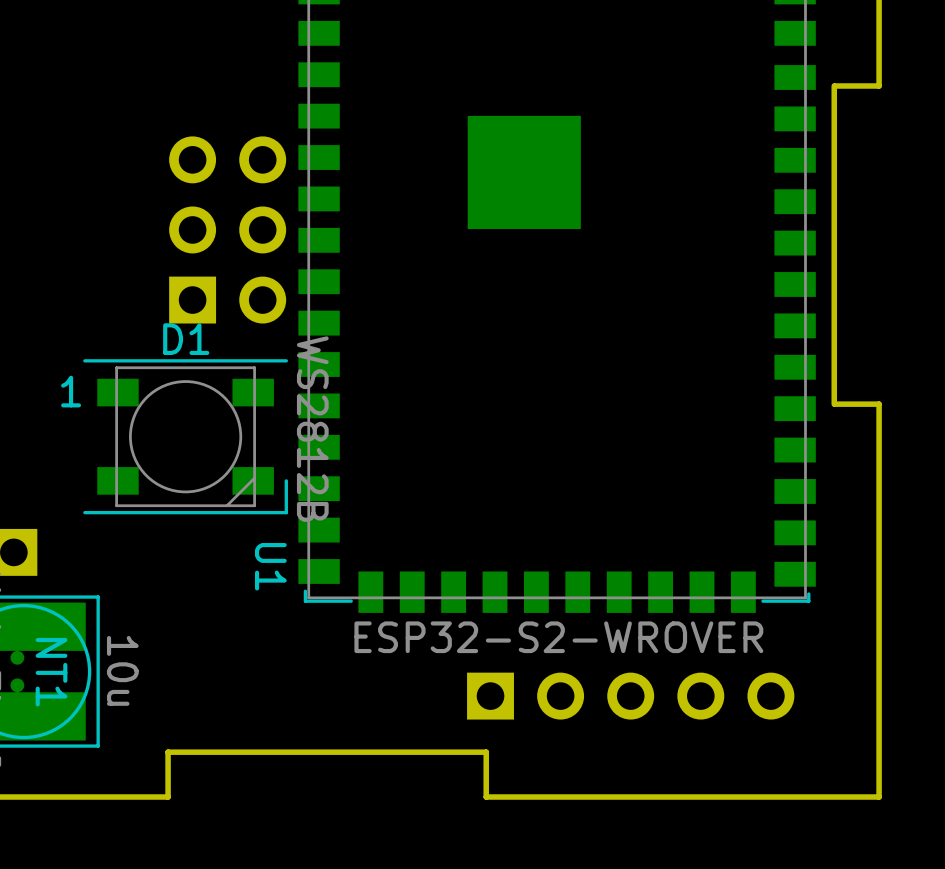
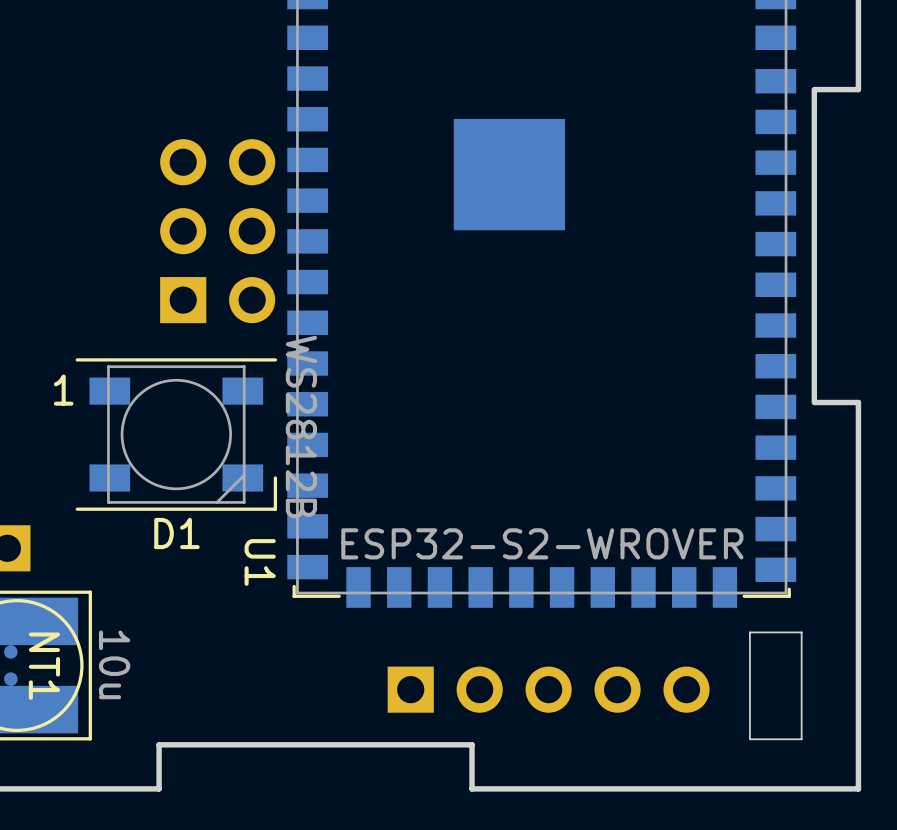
D1 name position: D1 (186, 339) -> D1 (176, 533)
U1 value position: ESP32-S2-WROVER (558, 637) -> ESP32-S2-WROVER (542, 543)
board edge: none -> (801, 632) (801, 739) (749, 739) (749, 632) (801, 632)
part position: (630, 696) -> (548, 689)

